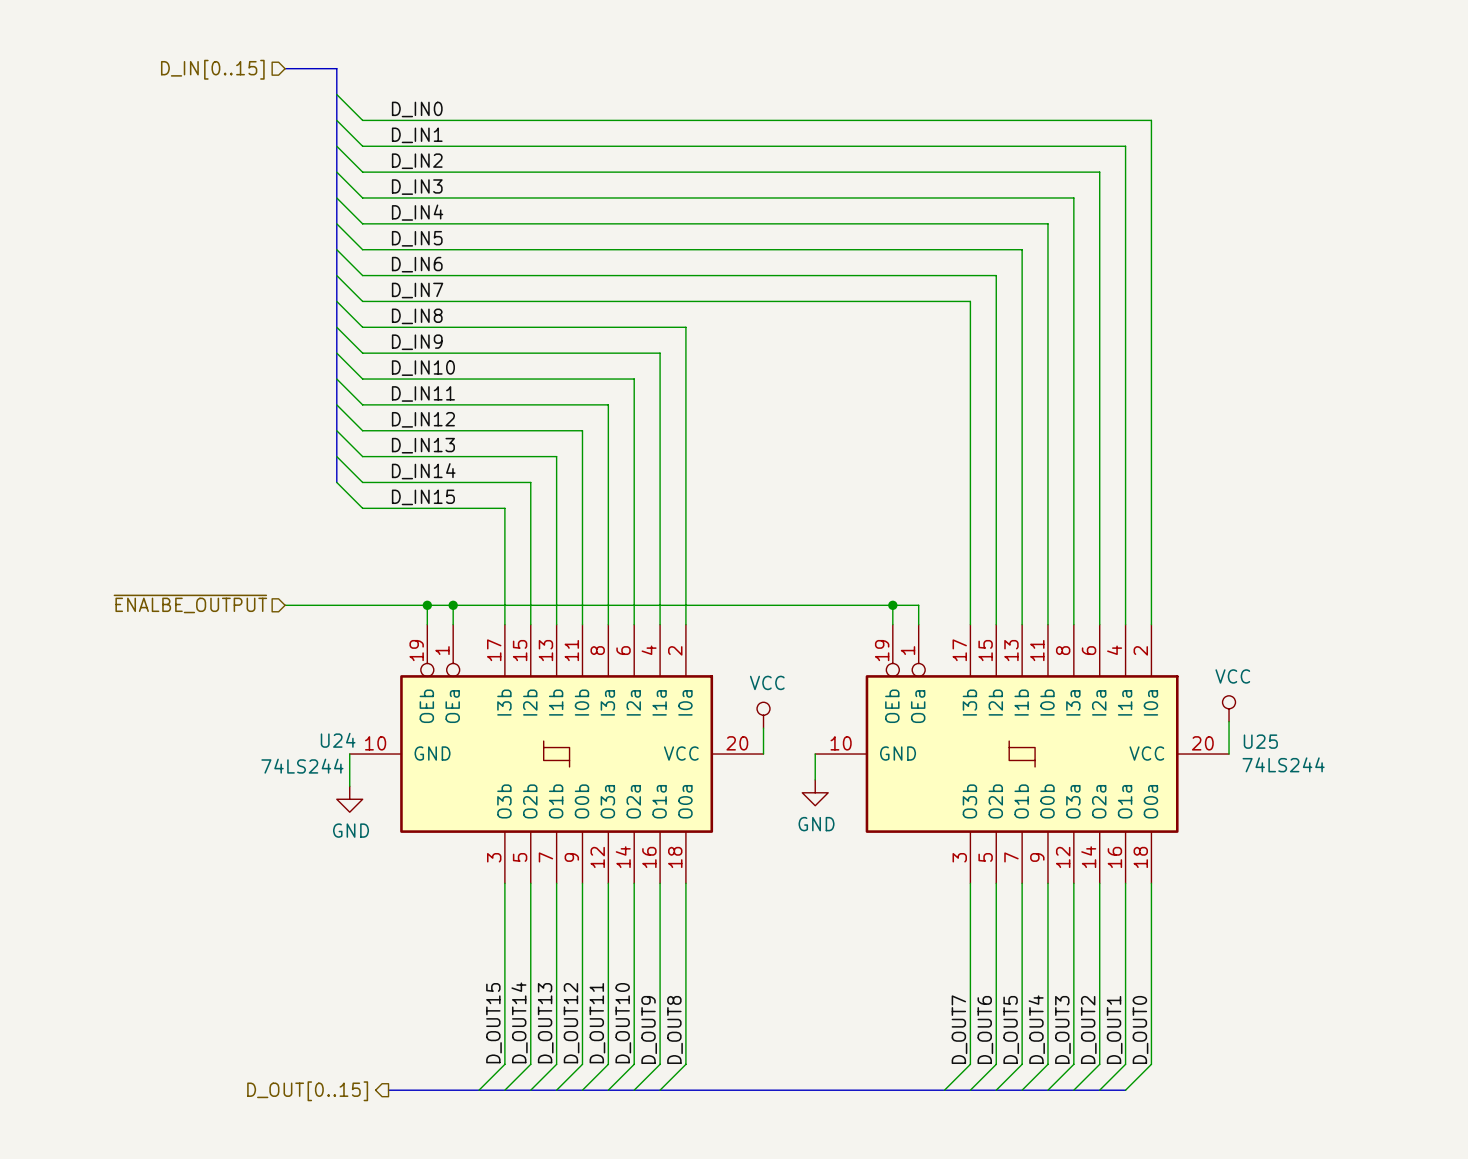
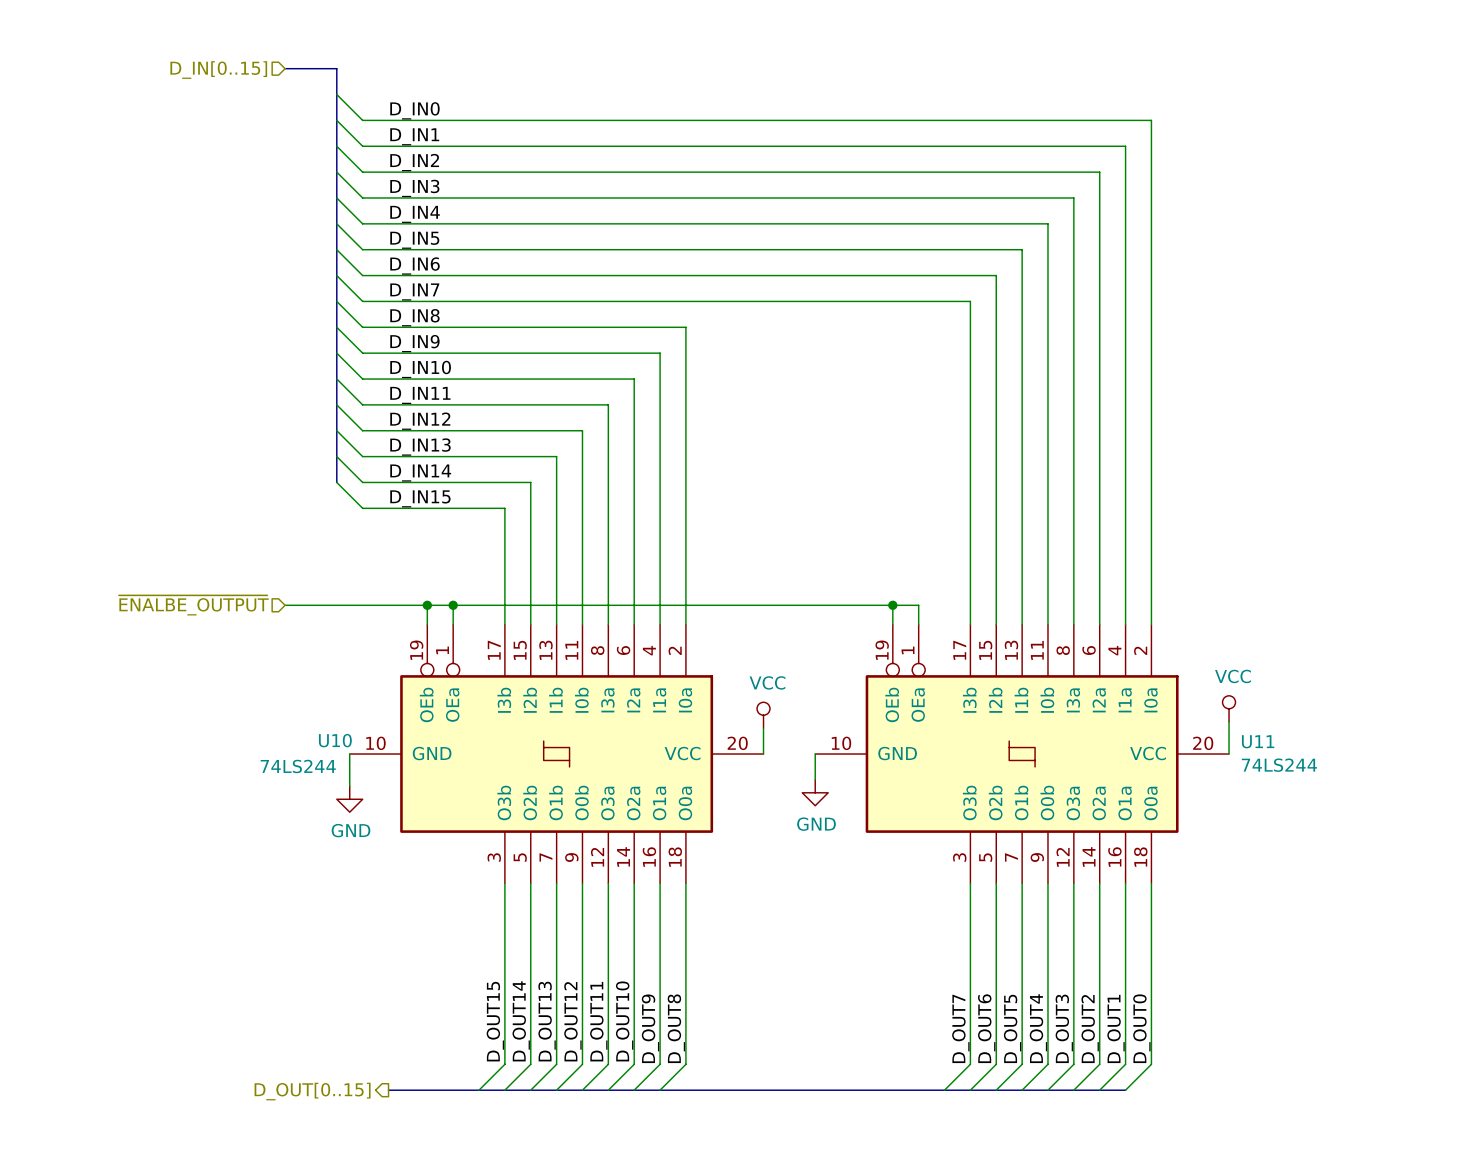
U24 name: U24 (338, 740) -> U10 (335, 740)
U25 name: U25 (1260, 741) -> U11 (1258, 741)

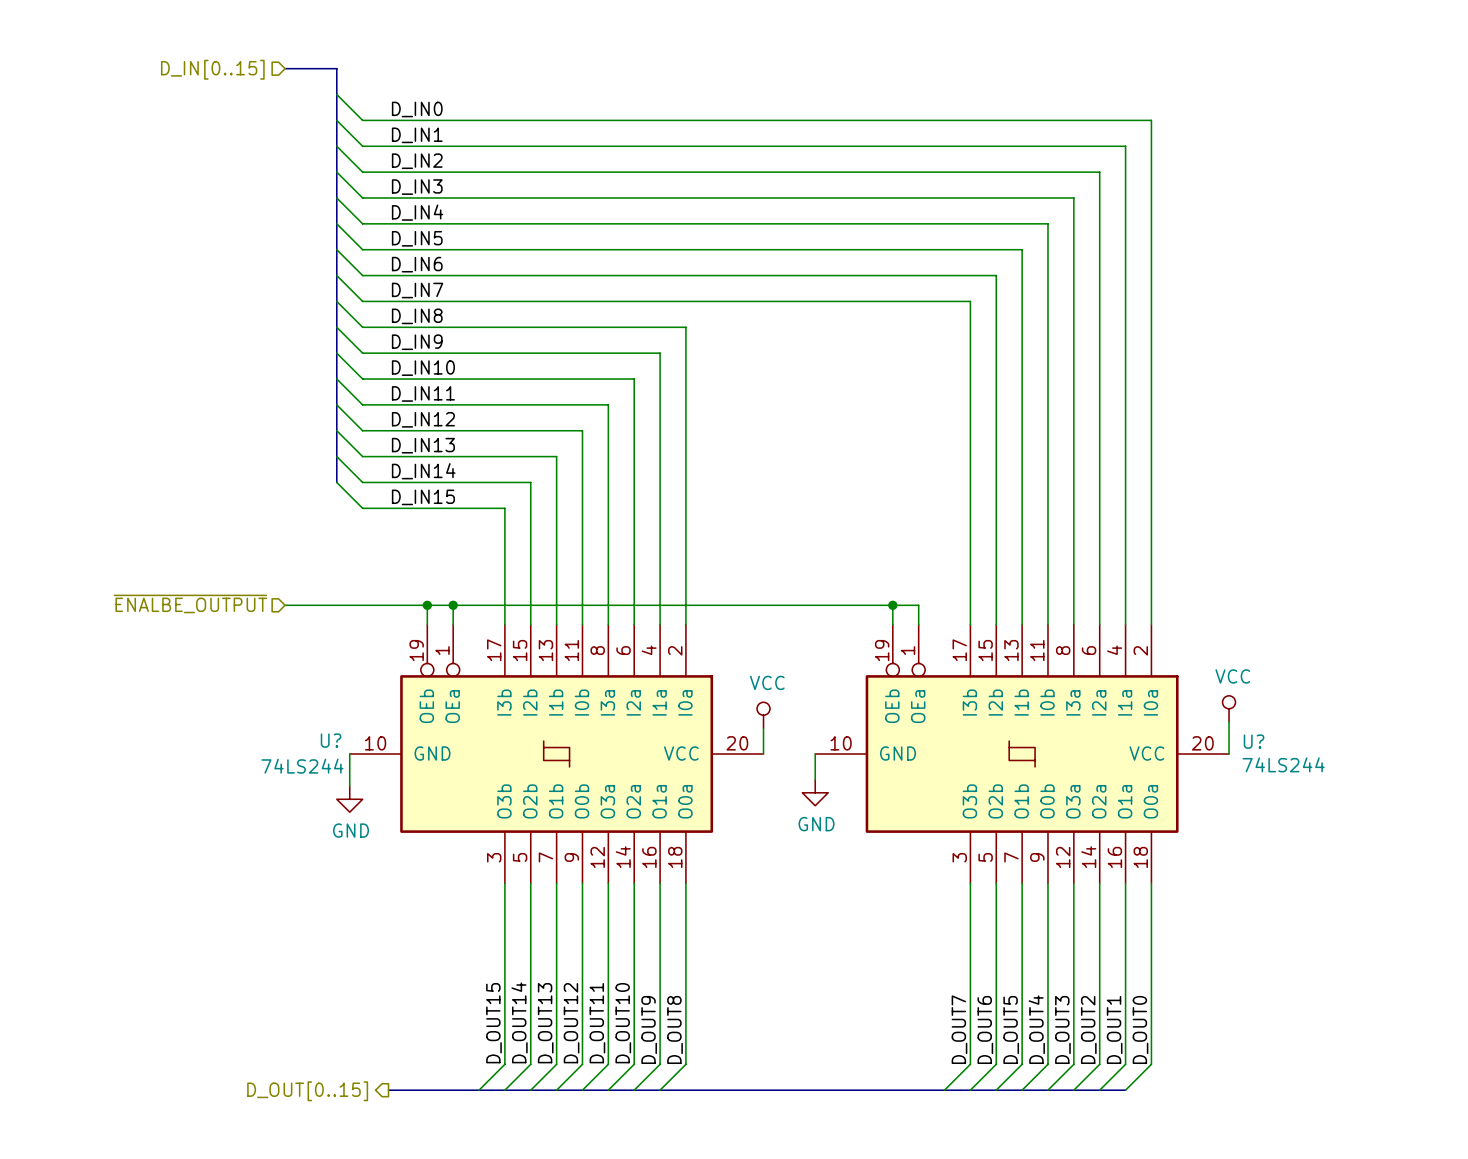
U10 name: U10 (335, 740) -> U? (331, 740)
U11 name: U11 (1258, 741) -> U? (1254, 741)

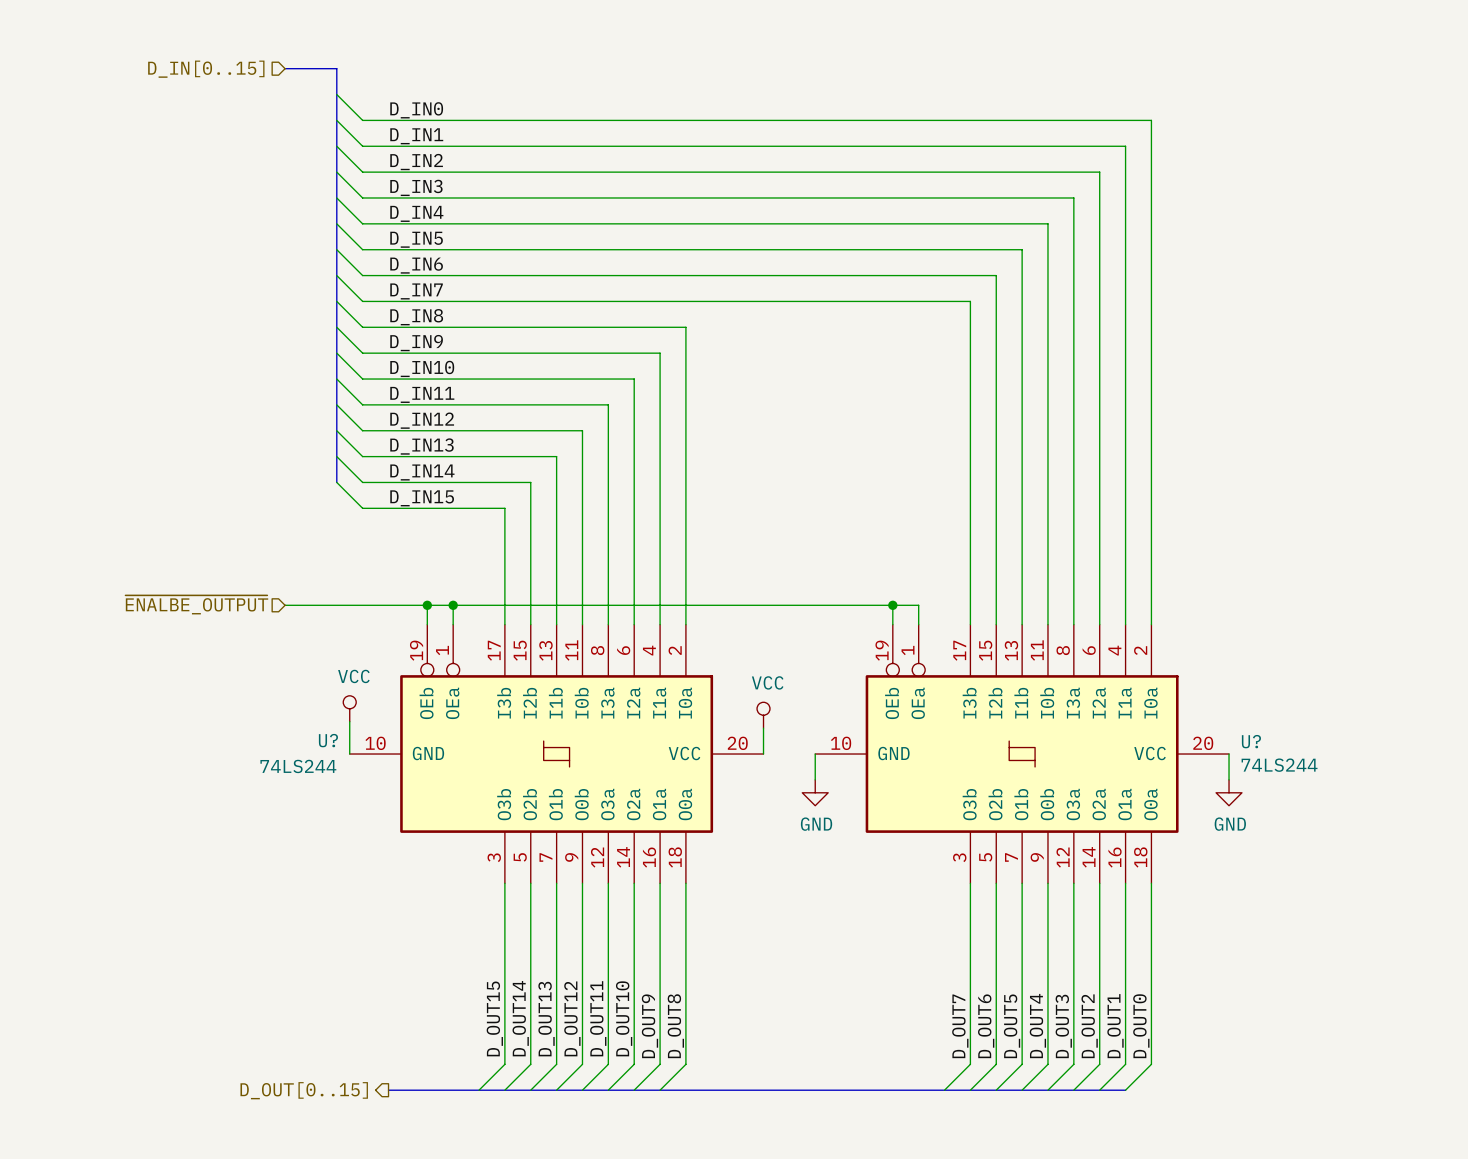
power symbol: none -> VCC (349, 708)
power symbol: VCC (1229, 708) -> none
wire: (1229, 721) (1229, 754) -> (1229, 779) (1229, 754)
wire: (349, 754) (349, 786) -> (349, 754) (349, 721)
power symbol: none -> GND (1229, 792)
power symbol: GND (349, 799) -> none

